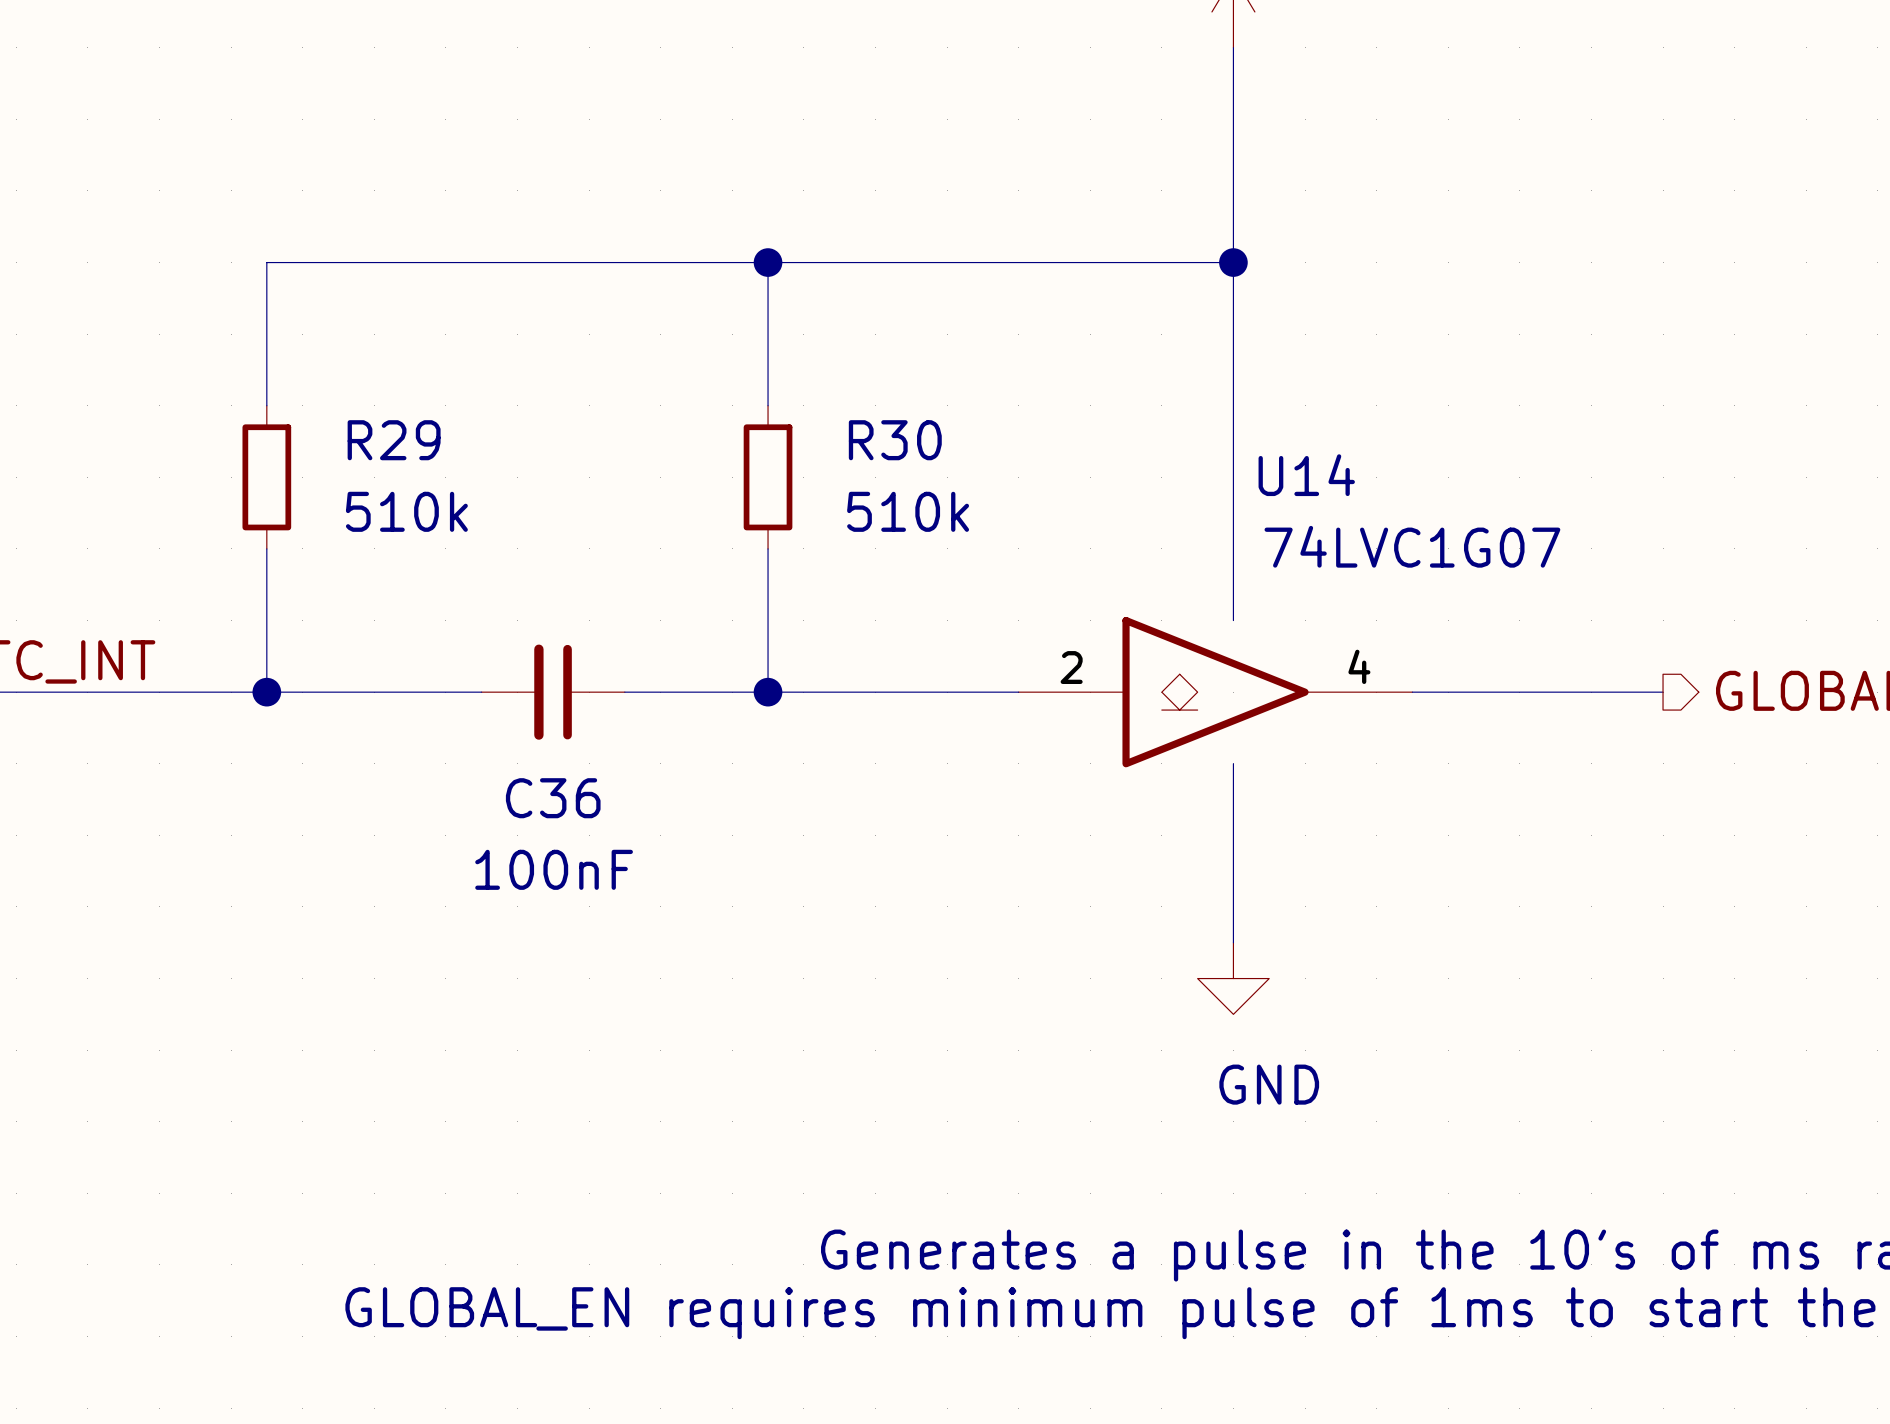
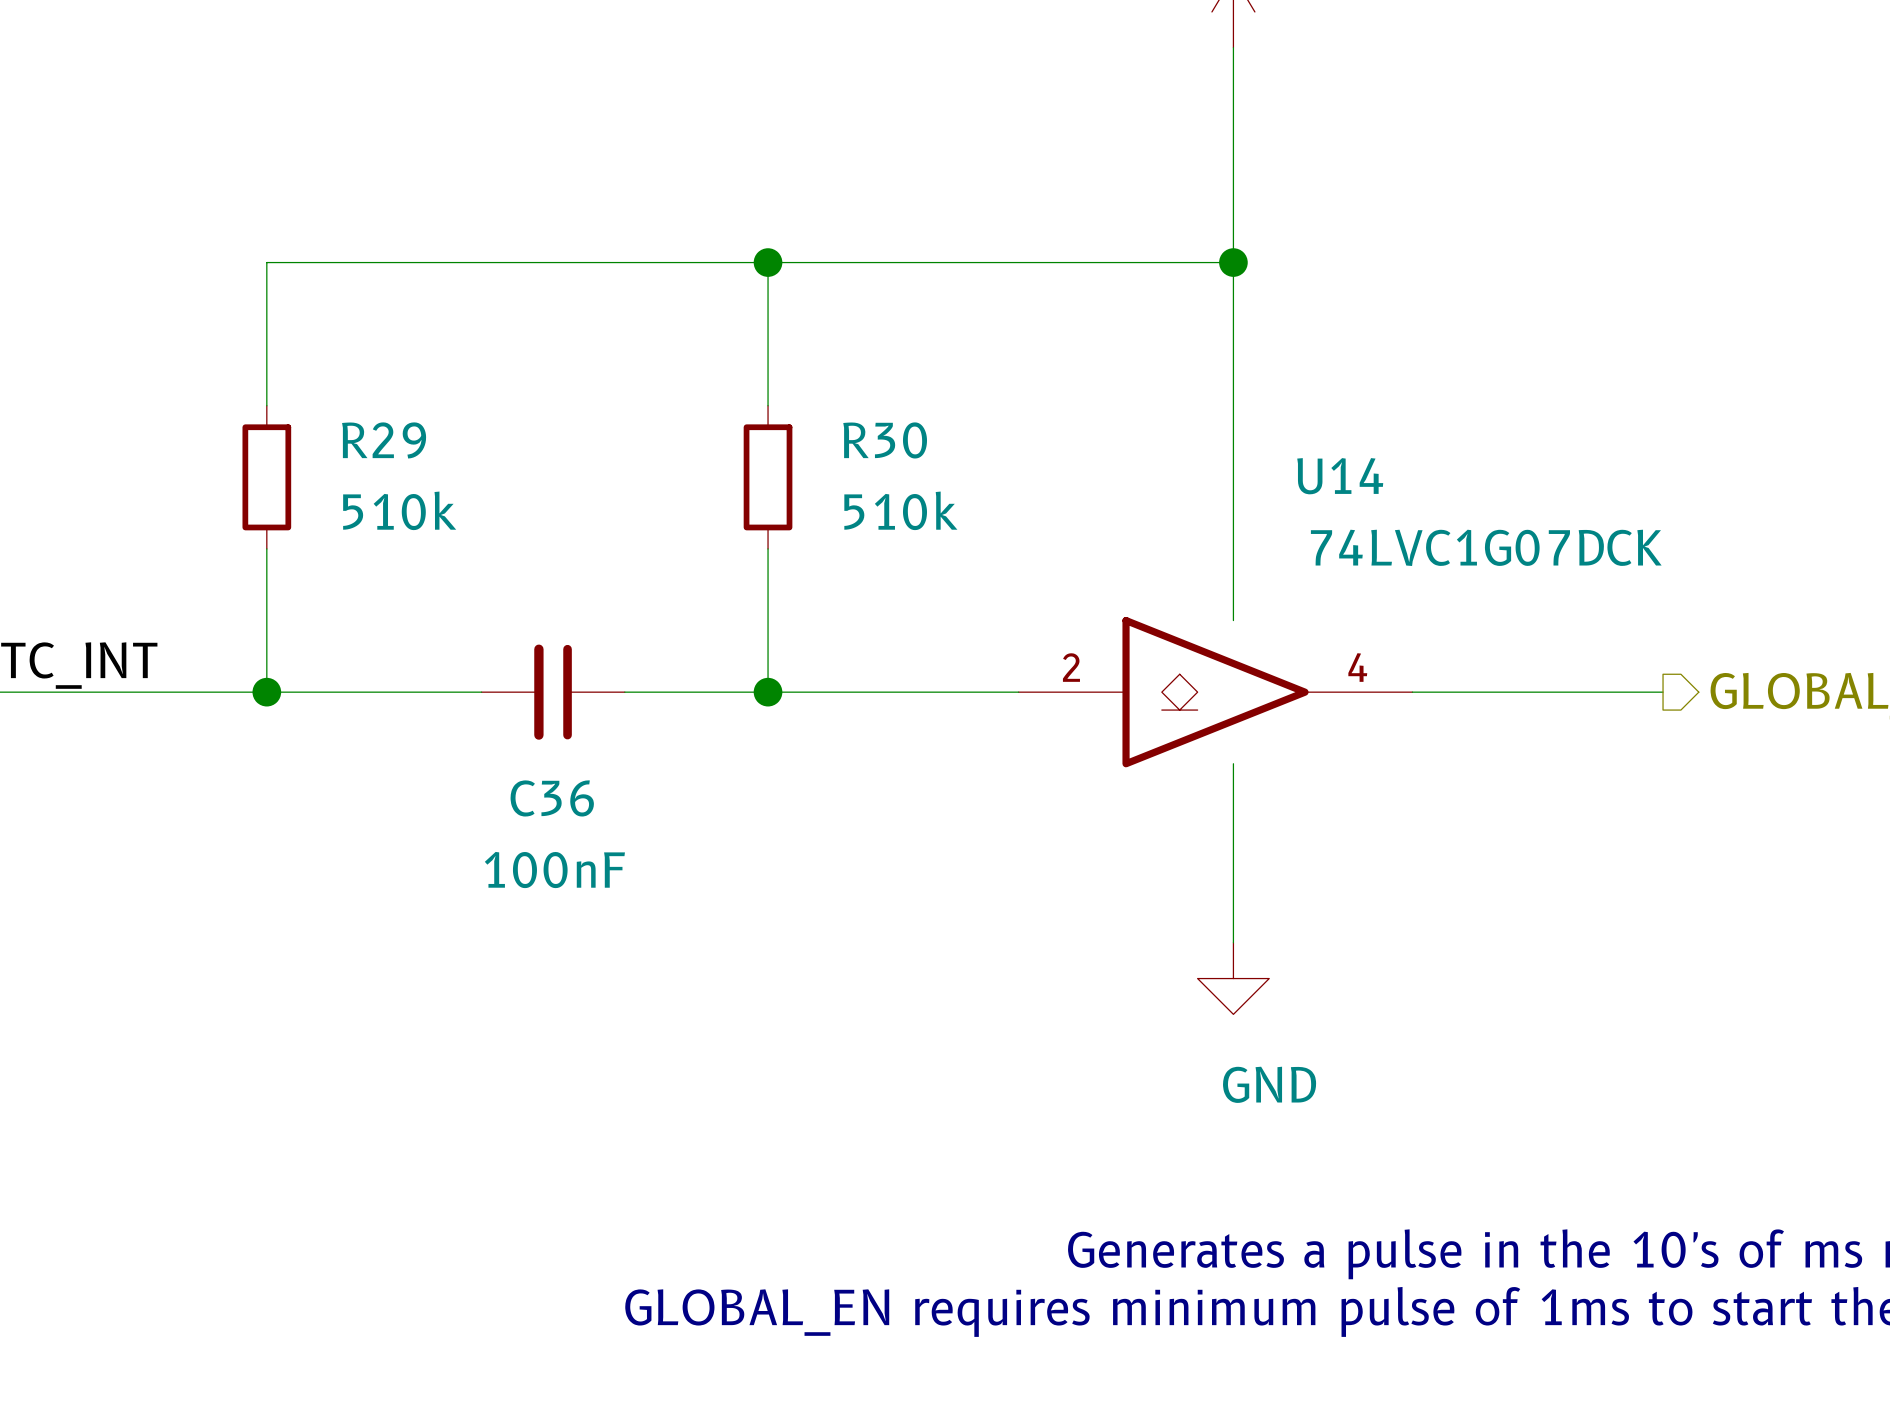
U14 name position: U14 (1306, 475) -> U14 (1340, 476)
U14 value: 74LVC1G07 (1412, 546) -> 74LVC1G07DCK (1486, 547)

